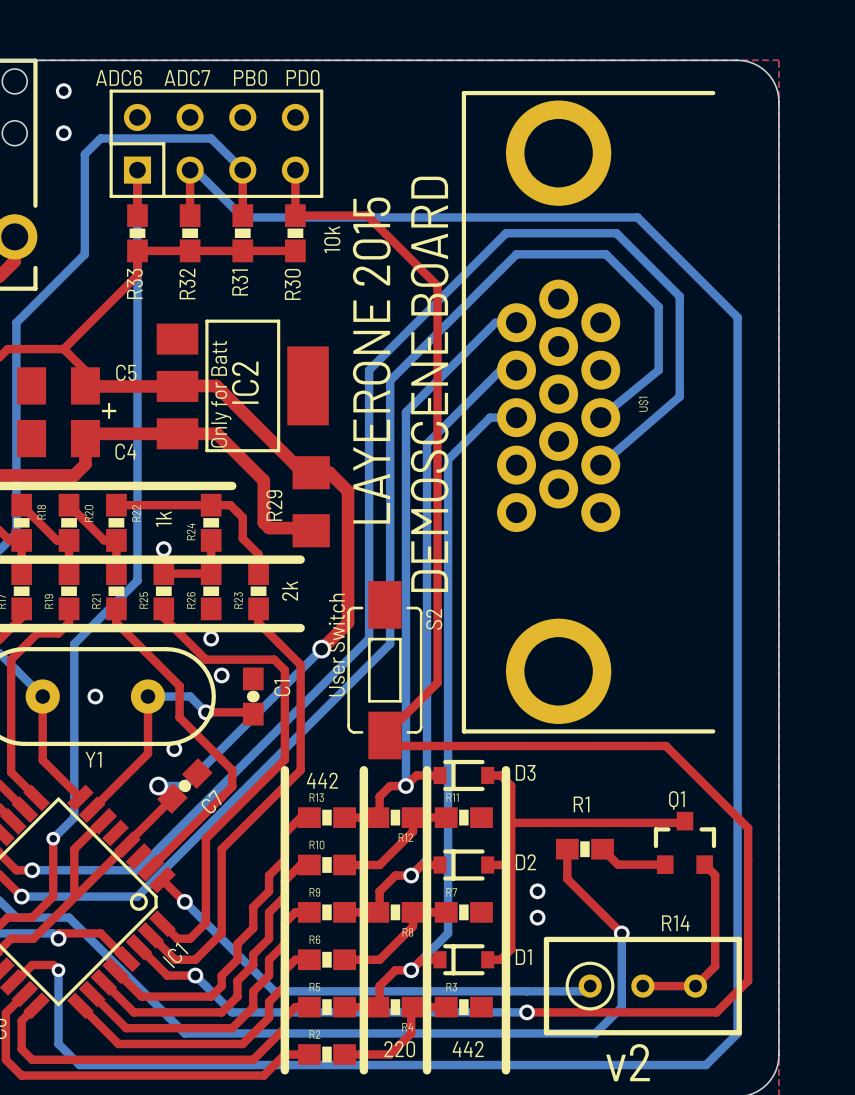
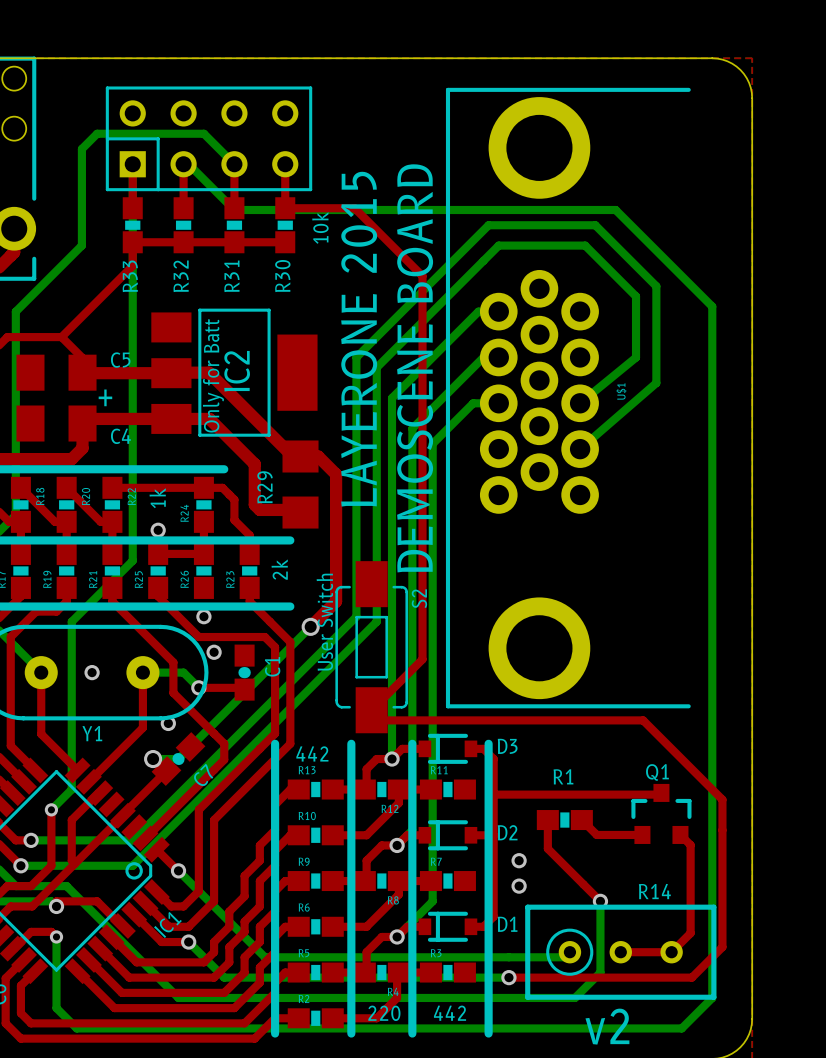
text: ADC6 (119, 77) -> none
text: ADC7 (187, 77) -> none
text: PB0 (250, 77) -> none
text: PD0 (303, 77) -> none
via: (63, 91) -> none
via: (63, 133) -> none

